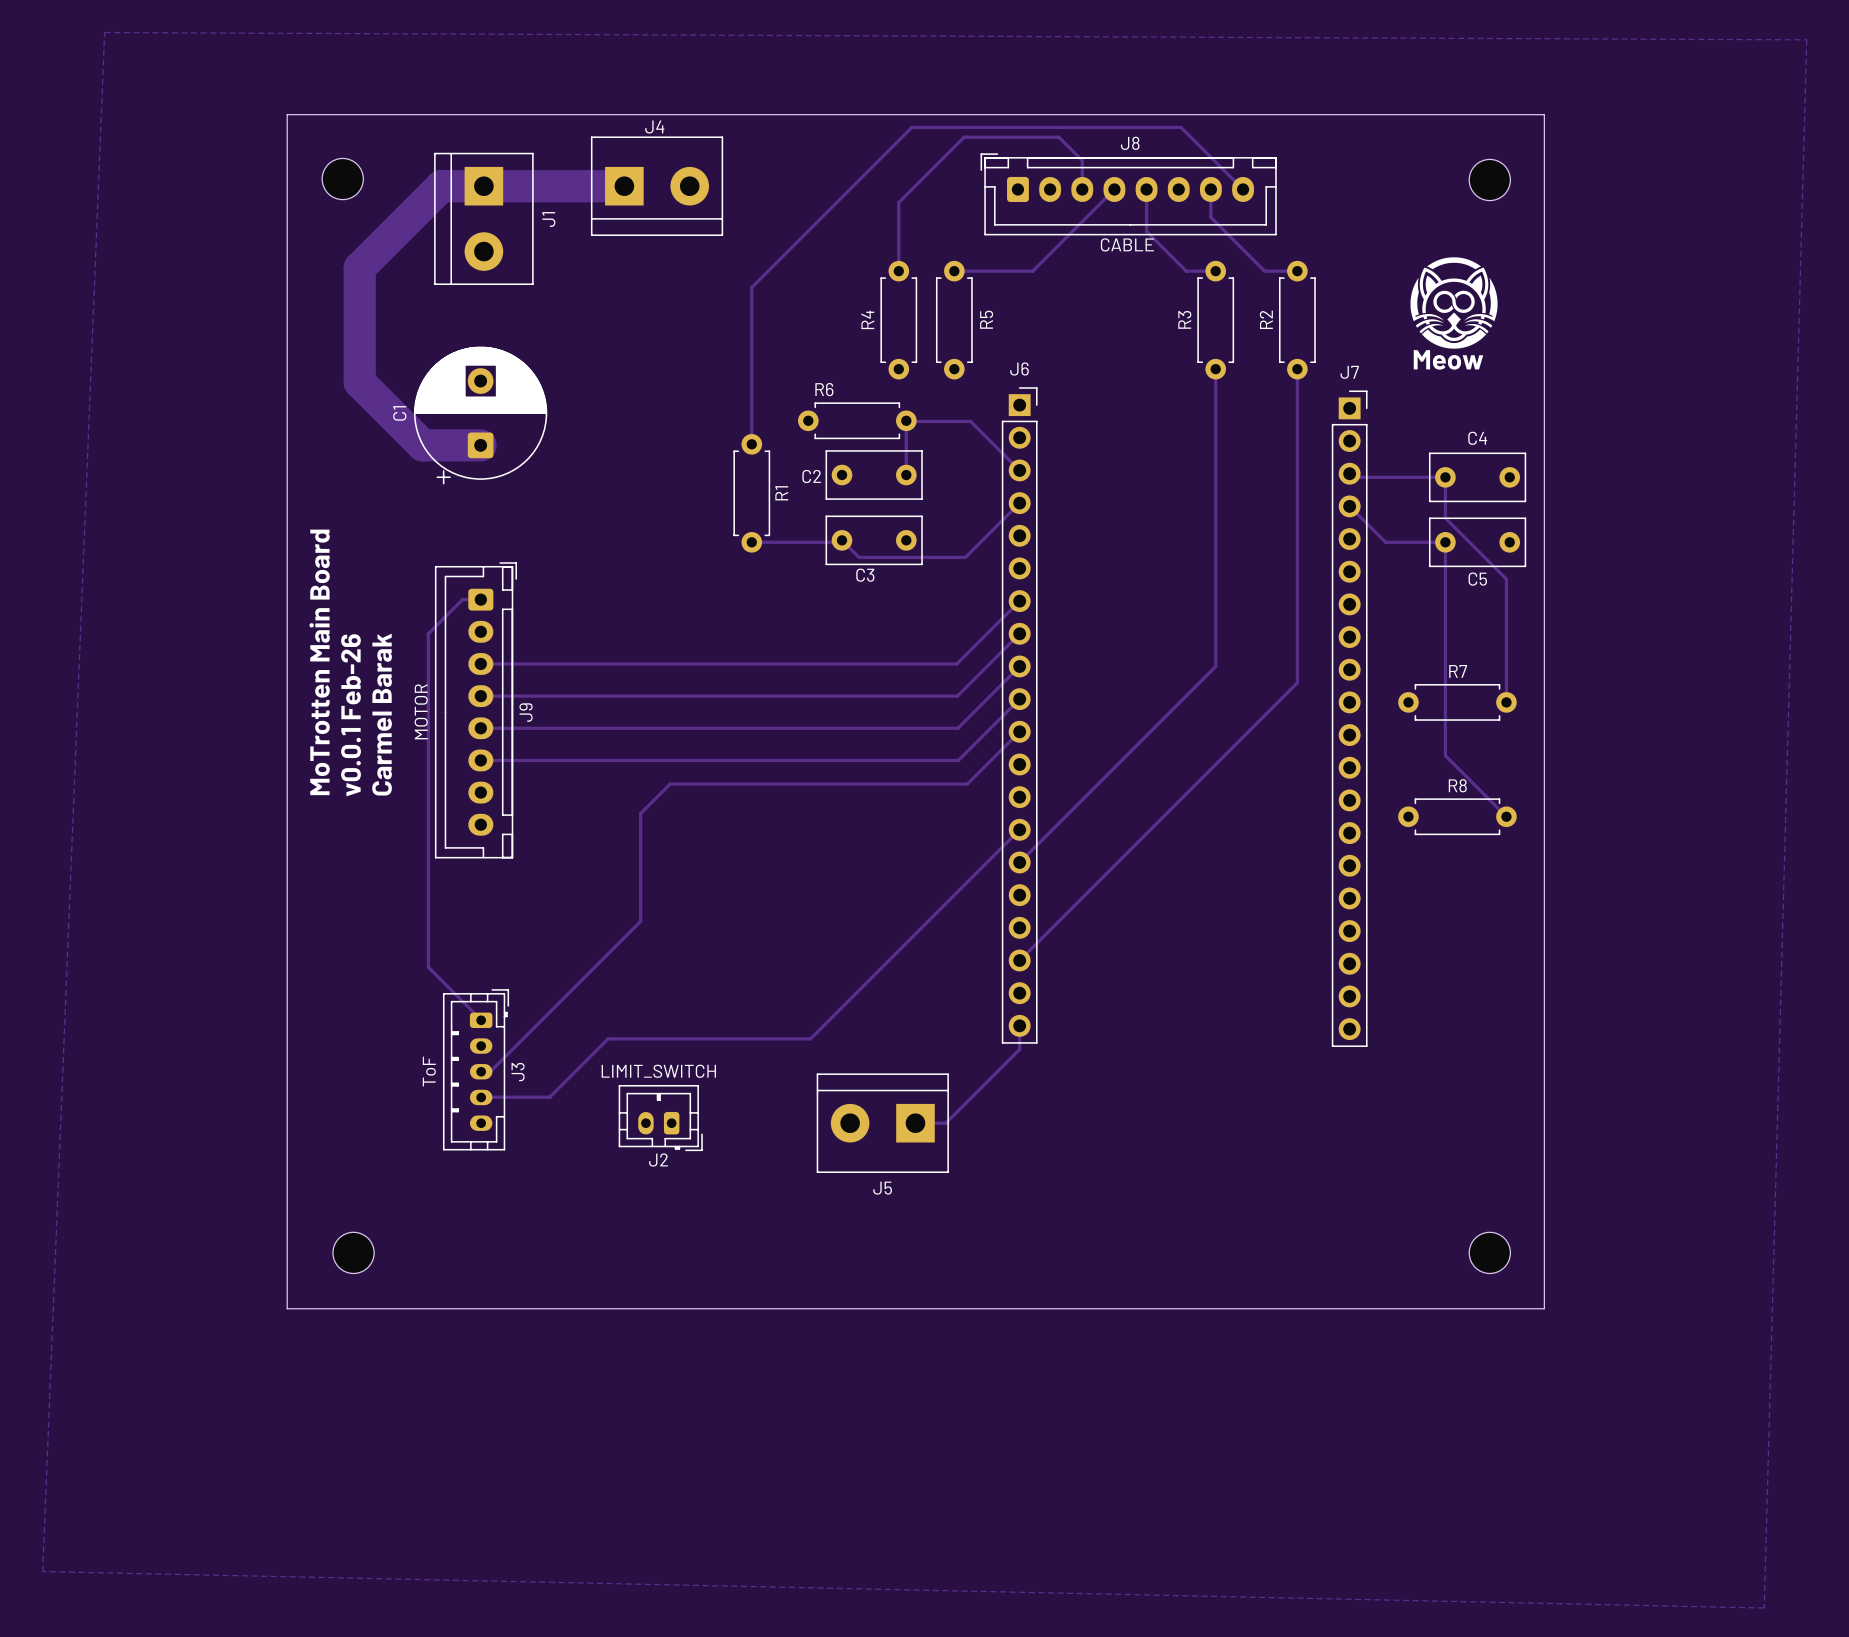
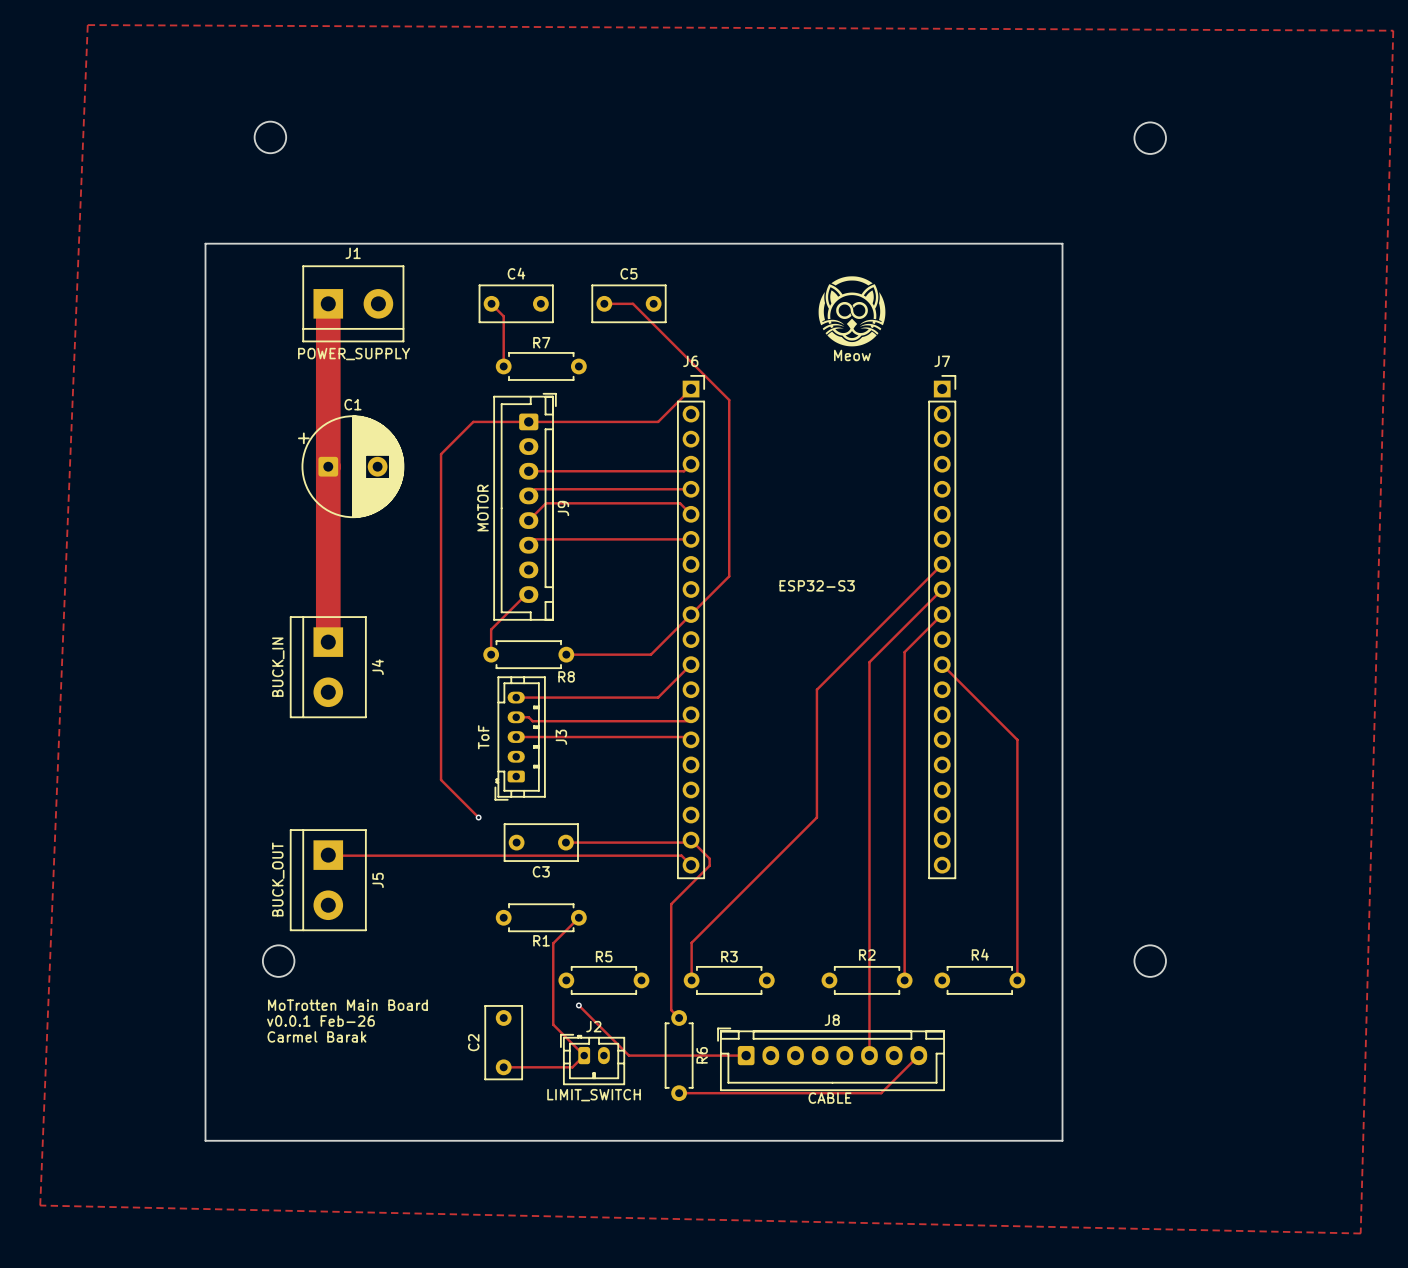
board edge: (287, 114) (1544, 114) (1544, 1308) (287, 1308) (287, 114) -> (205, 243) (205, 1140) (1062, 1140) (1062, 243) (205, 243)
track: (624, 186) (441, 186) (359, 267) (359, 382) (422, 445) (480, 445) -> none
J4 rotation: 0° (657, 186) -> 90° clockwise (328, 667)
J4 position: (657, 186) -> (328, 667)
track: (1082, 189) (1082, 160) (1058, 137) (964, 137) (898, 202) (898, 271) -> none
track: (1114, 189) (1032, 271) (954, 271) -> none
track: (1146, 189) (1146, 231) (1186, 271) (1215, 271) -> none
track: (1210, 189) (1210, 217) (1264, 271) (1297, 271) -> none
track: (1243, 189) (1180, 127) (911, 127) (751, 287) (751, 444) -> none
J8 position: (1128, 194) -> (831, 1059)
J1 rotation: 0° (483, 218) -> 90° counterclockwise (353, 303)
J1 position: (483, 218) -> (353, 303)
drawing: [1410, 257, 1498, 349] -> none
R5 name position: R5 (986, 319) -> R5 (604, 956)
R4 rotation: 0° (898, 320) -> 90° clockwise (979, 980)
R4 position: (898, 320) -> (979, 980)
R5 rotation: 0° (954, 320) -> 90° clockwise (603, 980)
R5 position: (954, 320) -> (603, 980)
R3 rotation: 0° (1215, 320) -> 90° clockwise (729, 980)
R3 position: (1215, 320) -> (729, 980)
R2 rotation: 0° (1297, 320) -> 90° clockwise (867, 980)
R2 position: (1297, 320) -> (867, 980)
text: Meow (1448, 359) -> none
drawing: none -> [818, 276, 886, 347]
track: (1215, 369) (1215, 666) (1019, 862) -> none
track: (1297, 369) (1297, 682) (1019, 960) -> none
R6 name position: R6 (824, 389) -> R6 (702, 1055)
track: none -> (328, 303) (328, 642)
track: none -> (491, 303) (503, 316) (503, 366)
track: none -> (604, 303) (632, 303) (729, 400) (729, 576) (650, 654) (566, 654)
C1 rotation: 0° (480, 415) -> 90° clockwise (351, 466)
C1 position: (480, 415) -> (351, 466)
R6 rotation: 0° (857, 420) -> 90° clockwise (679, 1055)
R6 position: (857, 420) -> (679, 1055)
J1 value: none -> POWER_SUPPLY (354, 354)
text: none -> Meow (852, 355)
track: (1019, 470) (970, 421) (906, 420) (906, 475) -> none
track: (1349, 473) (1353, 477) (1445, 477) (1445, 518) (1506, 579) (1506, 702) -> none
C3 position: (874, 475) -> (541, 842)
C2 name position: C2 (811, 476) -> C2 (473, 1042)
C4 position: (1477, 477) -> (516, 303)
R1 rotation: 0° (751, 493) -> 90° clockwise (541, 917)
R1 position: (751, 493) -> (541, 917)
track: (1019, 503) (965, 557) (859, 557) (842, 540) (840, 542) (751, 542) -> none
track: (1349, 506) (1385, 542) (1445, 542) (1445, 755) (1506, 816) -> none
track: none -> (691, 389) (658, 421) (473, 421) (441, 454) (441, 779) (478, 817)
C2 rotation: 0° (874, 540) -> 90° clockwise (503, 1042)
C2 position: (874, 540) -> (503, 1042)
C5 position: (1477, 542) -> (628, 303)
C3 name position: C3 (865, 575) -> C3 (541, 871)
C5 name position: C5 (1477, 579) -> C5 (628, 273)
track: (480, 599) (462, 599) (428, 633) (428, 967) (481, 1020) -> none
track: none -> (688, 461) (691, 464) (684, 471) (528, 471)
track: (1019, 601) (956, 663) (480, 663) -> none
track: (1019, 633) (957, 696) (480, 696) -> none
track: none -> (691, 489) (535, 489) (528, 495)
text: MoTrotten Main Board (319, 662) -> none
track: (1019, 666) (957, 728) (480, 728) -> none
track: none -> (691, 514) (680, 503) (545, 503) (528, 520)
track: (1019, 699) (958, 760) (480, 760) -> none
R7 position: (1457, 702) -> (541, 366)
track: none -> (691, 539) (534, 539) (528, 545)
J9 position: (475, 710) -> (525, 506)
text: Carmel Barak (382, 714) -> none
text: v0.0.1 Feb-26 (351, 715) -> none
J6 position: (1019, 715) -> (691, 627)
J7 position: (1349, 718) -> (942, 627)
track: (1019, 731) (967, 784) (670, 784) (640, 813) (640, 921) (490, 1071) (481, 1071) -> none
track: none -> (942, 564) (816, 689) (816, 817) (691, 942) (691, 980)
text: none -> ESP32-S3 (817, 585)
track: none -> (942, 589) (869, 662) (869, 1055)
track: none -> (528, 594) (526, 594) (491, 629) (491, 654)
R8 name position: R8 (1457, 785) -> R8 (566, 676)
track: none -> (942, 614) (904, 652) (904, 980)
R8 position: (1457, 816) -> (528, 654)
track: (1019, 829) (810, 1038) (608, 1038) (549, 1097) (481, 1097) -> none
track: none -> (691, 664) (658, 697) (516, 697)
track: none -> (942, 664) (1017, 739) (1017, 985)
J4 value: none -> BUCK_IN (278, 667)
track: none -> (516, 717) (528, 717) (532, 721) (691, 721)
track: none -> (516, 737) (688, 737) (691, 739)
track: (1019, 1025) (1019, 1049) (945, 1123) (915, 1123) -> none
via: none -> (478, 817)
J3 rotation: 0° (476, 1069) -> 180° (520, 738)
J3 position: (476, 1069) -> (520, 738)
track: none -> (565, 842) (688, 842) (691, 840) (709, 858) (709, 865) (671, 904) (671, 1010) (679, 1018)
track: none -> (328, 855) (681, 855) (691, 865)
J2 rotation: 0° (660, 1118) -> 180° (592, 1059)
J2 position: (660, 1118) -> (592, 1059)
J5 rotation: 0° (882, 1123) -> 90° counterclockwise (328, 880)
J5 position: (882, 1123) -> (328, 880)
J5 value: none -> BUCK_OUT (278, 879)
track: none -> (578, 917) (553, 943) (553, 1024) (584, 1055) (572, 1067) (503, 1067)
text: none -> MoTrotten Main Board (347, 1005)
track: none -> (578, 1005) (628, 1055) (746, 1055)
via: none -> (578, 1005)
text: none -> v0.0.1 Feb-26 (320, 1021)
text: none -> Carmel Barak (316, 1036)
track: none -> (918, 1055) (881, 1093) (679, 1093)

